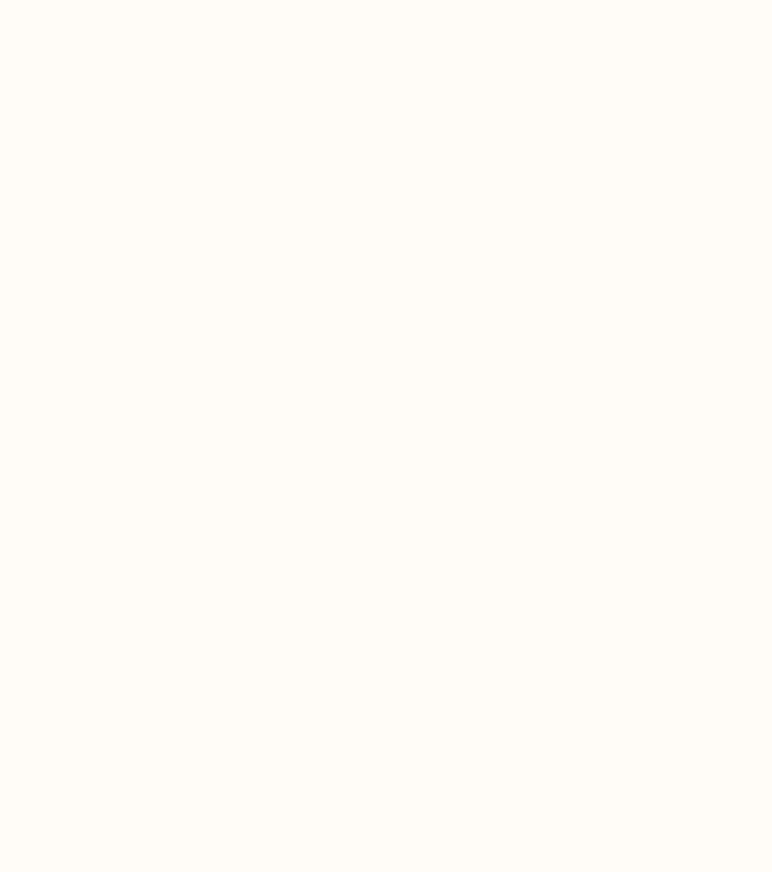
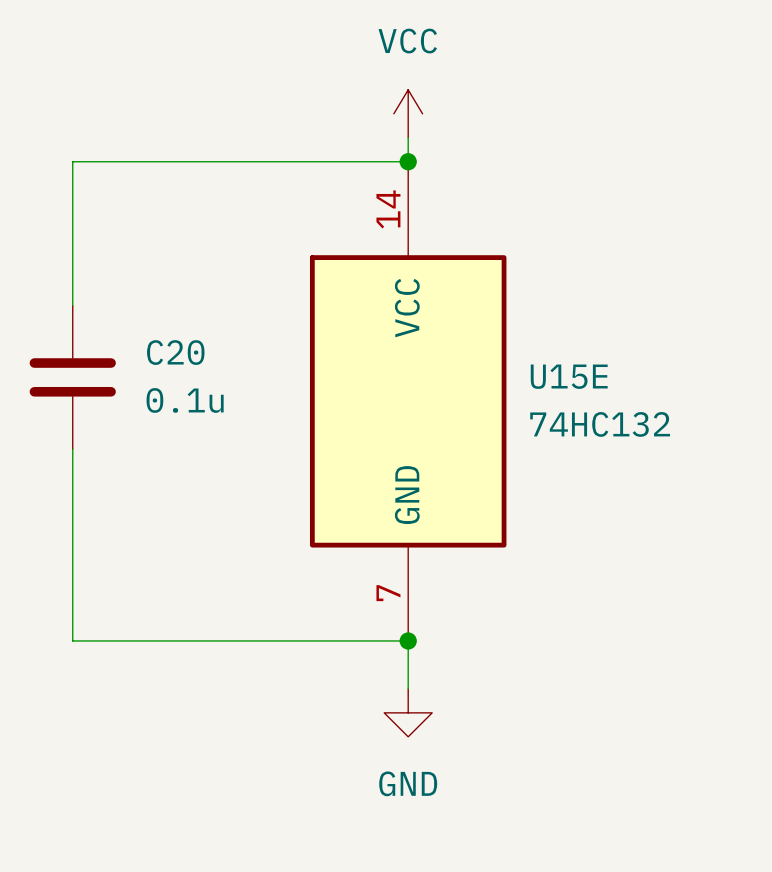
power symbol: none -> VCC (408, 113)
wire: none -> (408, 137) (408, 161) (72, 161) (72, 305)
junction: none -> (408, 161)
C20: none -> 0.1u (72, 377)
U15E: none -> 74HC132 (408, 401)
wire: none -> (72, 449) (72, 640) (408, 640) (408, 688)
junction: none -> (408, 640)
power symbol: none -> GND (408, 712)

